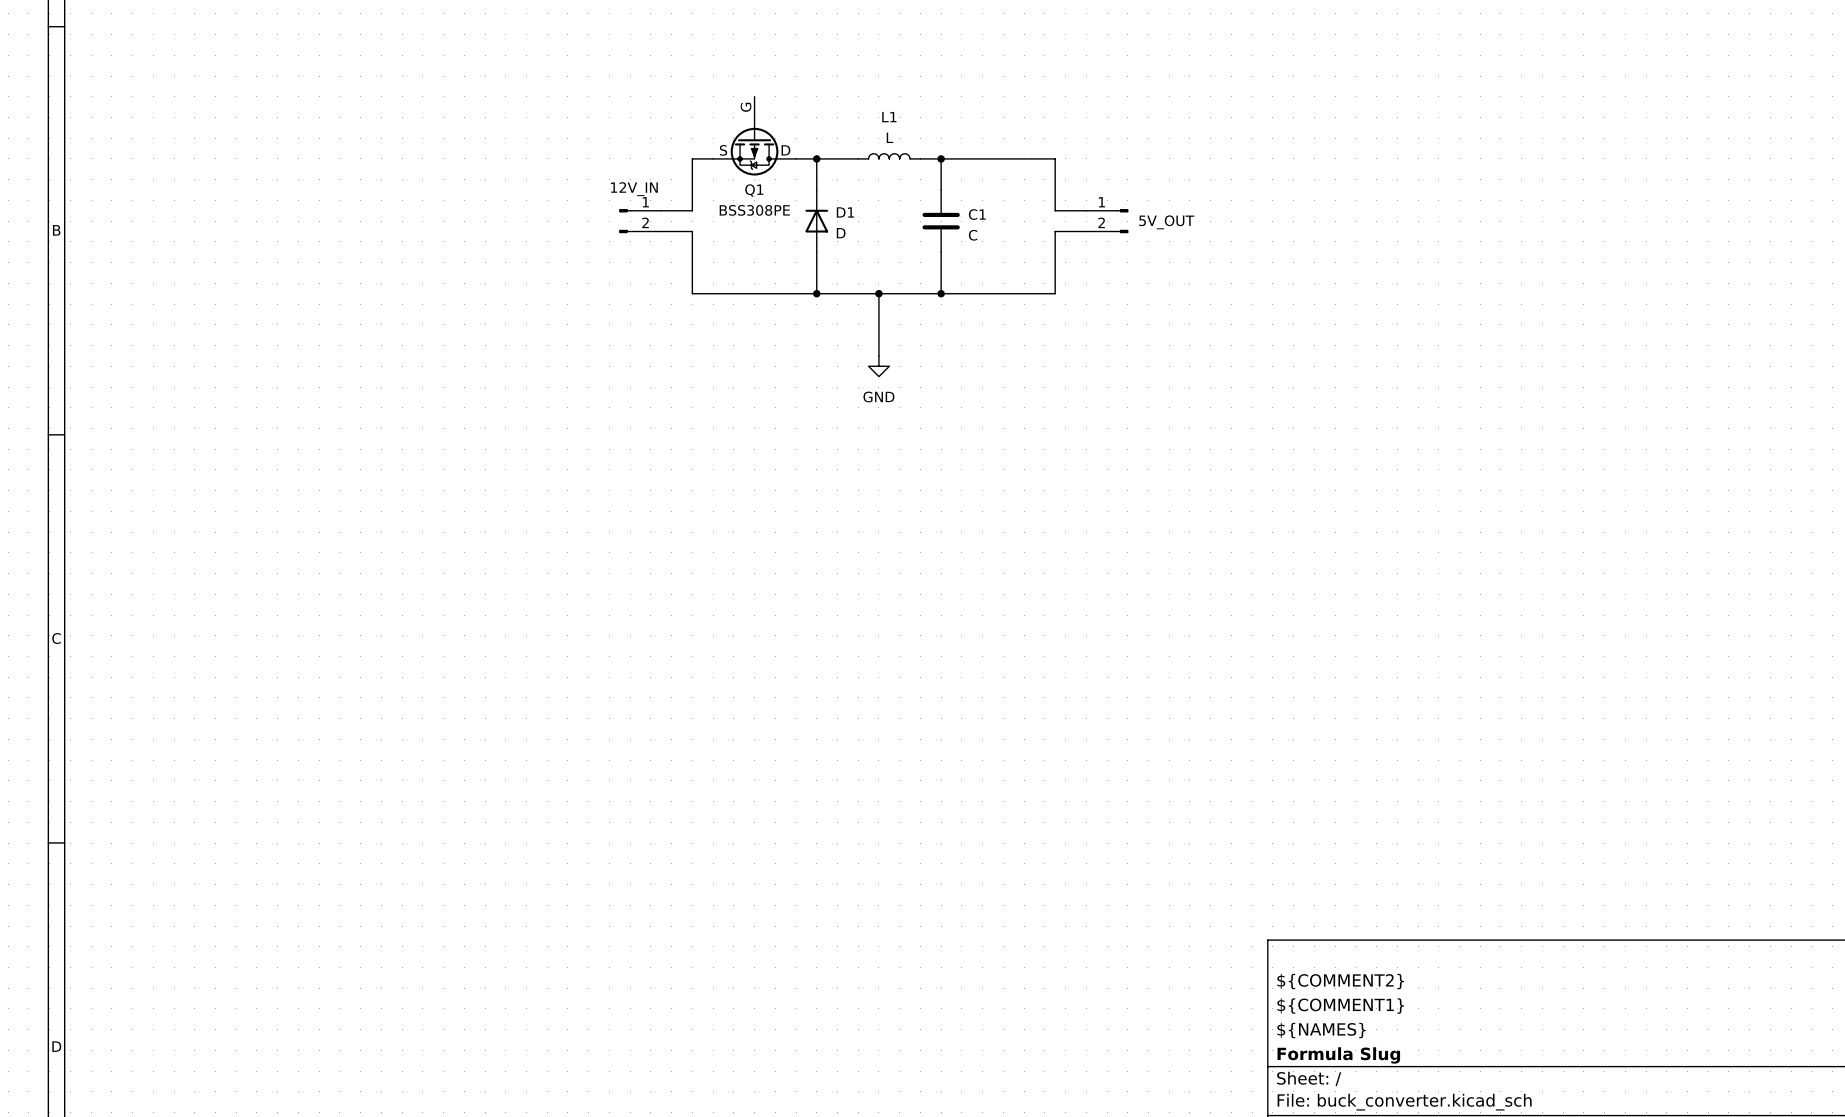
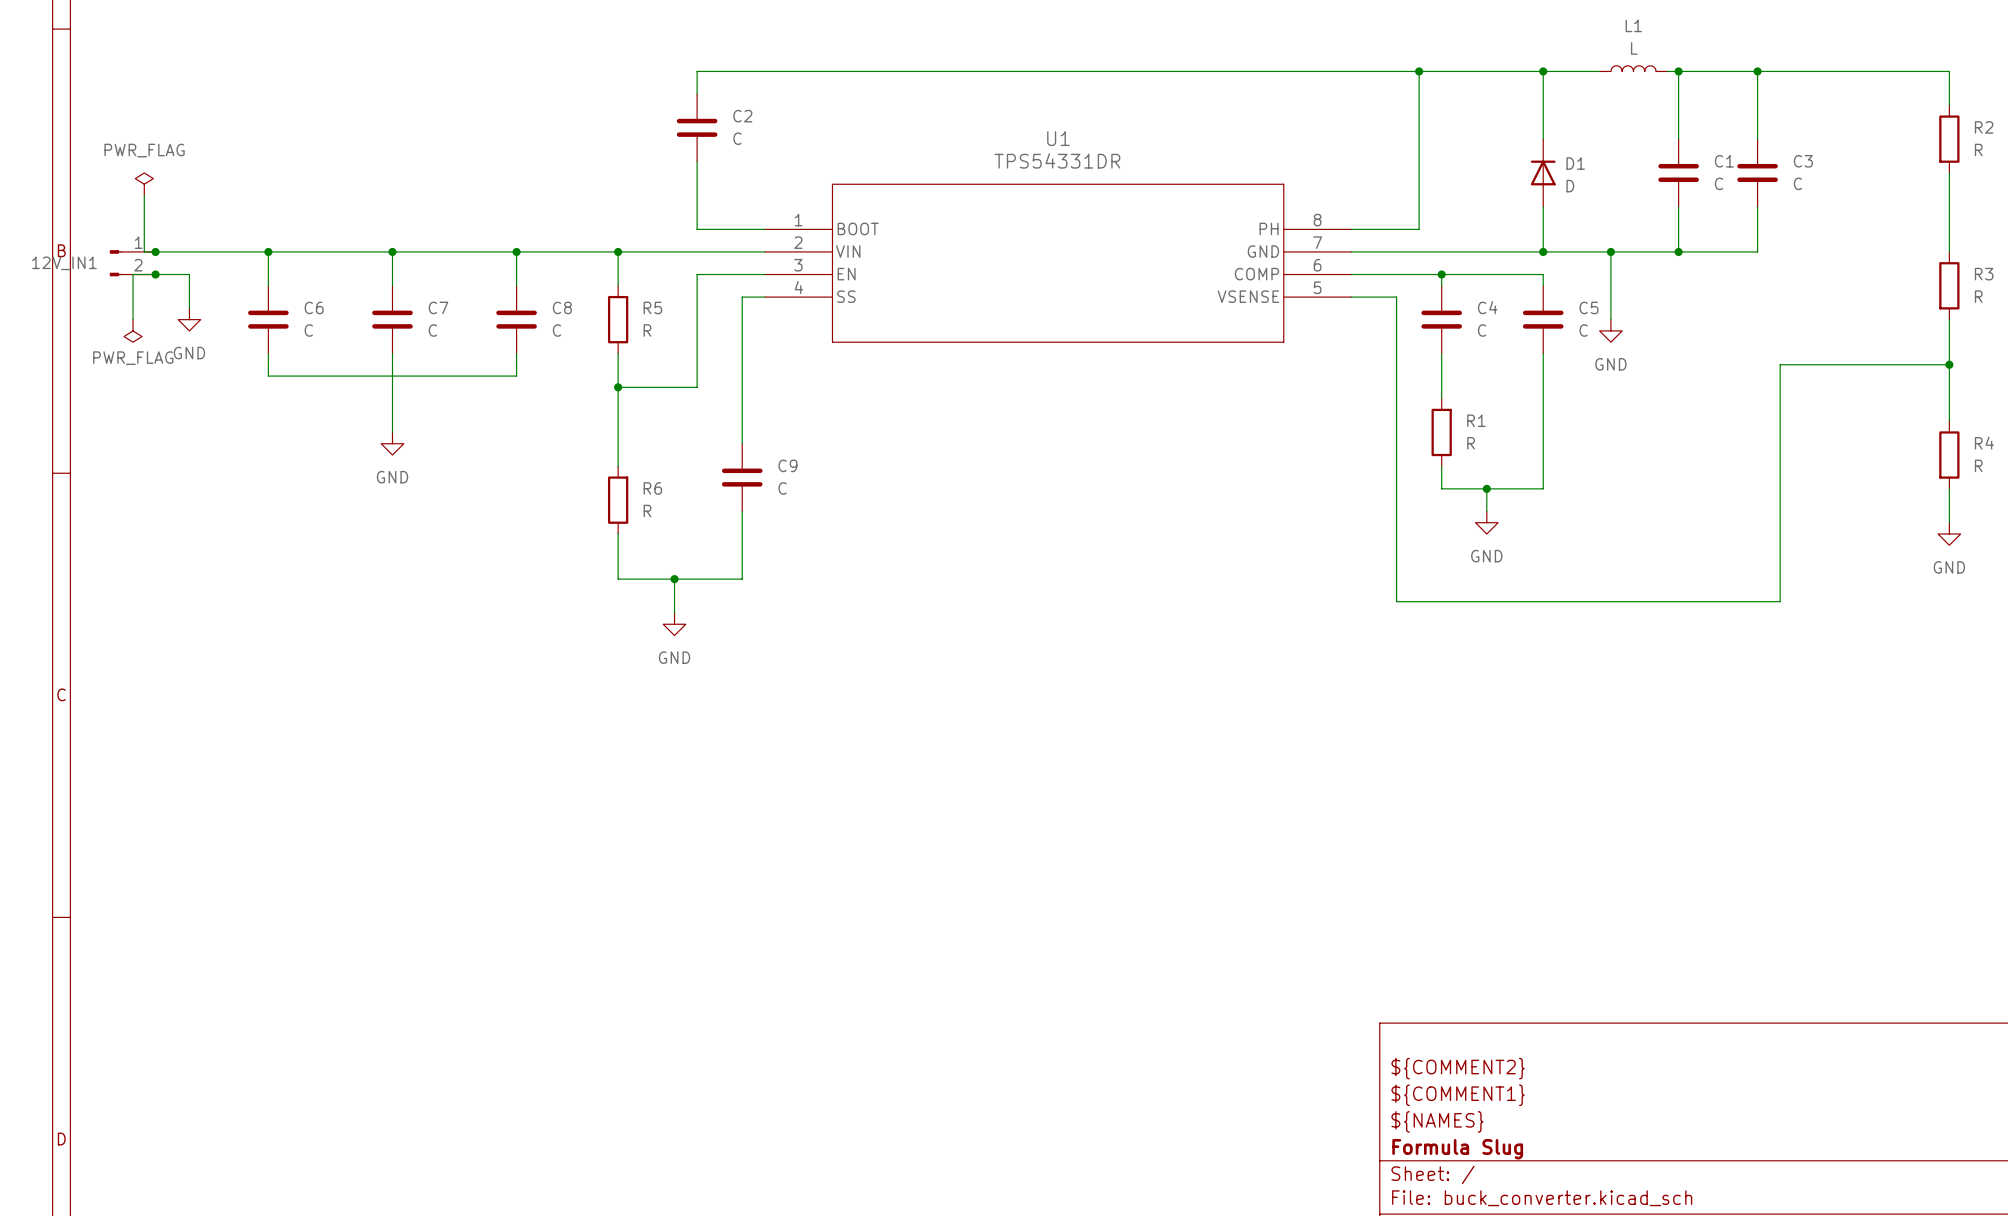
wire: none -> (1419, 71) (1419, 229) (1351, 229)
junction: none -> (1419, 71)
wire: none -> (1543, 71) (1543, 139)
junction: none -> (1543, 71)
wire: none -> (1599, 71) (697, 71) (697, 94)
wire: none -> (1667, 71) (1949, 71) (1949, 105)
wire: none -> (1678, 71) (1678, 139)
junction: none -> (1678, 71)
wire: none -> (1757, 71) (1757, 139)
junction: none -> (1757, 71)
C2: none -> C (697, 127)
R2: none -> R (1949, 139)
Q1: BSS308PE (754, 136) -> none
wire: none -> (697, 161) (697, 229) (719, 229)
L1 position: (889, 156) -> (1633, 68)
wire: (713, 158) (692, 158) (692, 210) -> (764, 229) (753, 229)
wire: (796, 158) (858, 158) -> none
wire: (816, 158) (816, 190) -> none
junction: (816, 158) -> none
wire: (920, 158) (1055, 158) (1055, 210) (1086, 210) -> none
wire: (941, 158) (941, 190) -> none
junction: (941, 158) -> none
C3: none -> C (1757, 172)
wire: none -> (1949, 172) (1949, 251)
power symbol: none -> PWR_FLAG (144, 184)
wire: none -> (144, 195) (144, 251) (719, 251)
wire: none -> (1543, 206) (1543, 251)
wire: none -> (1678, 206) (1678, 251)
wire: none -> (1757, 206) (1757, 251) (1351, 251)
C1 name position: C1 (977, 214) -> C1 (1724, 161)
12V_IN: (640, 221) -> none
D1 position: (816, 221) -> (1543, 172)
C1 position: (941, 221) -> (1678, 172)
5V_OUT: (1107, 221) -> none
junction: none -> (155, 251)
wire: none -> (268, 251) (268, 285)
junction: none -> (268, 251)
wire: none -> (392, 251) (392, 285)
junction: none -> (392, 251)
wire: none -> (516, 251) (516, 285)
junction: none -> (516, 251)
wire: none -> (618, 251) (618, 285)
junction: none -> (618, 251)
wire: (692, 231) (692, 293) (1055, 293) (1055, 231) (1086, 231) -> (753, 251) (764, 251)
junction: none -> (1543, 251)
wire: none -> (1610, 251) (1610, 319)
junction: none -> (1610, 251)
junction: none -> (1678, 251)
C1 value position: C (973, 235) -> C (1718, 183)
12V_IN1: none -> (132, 263)
U1: none -> TPS54331DR (1058, 263)
junction: none -> (155, 274)
wire: none -> (764, 274) (697, 274) (697, 387) (618, 387)
wire: (816, 252) (816, 293) -> none
wire: (941, 252) (941, 293) -> none
wire: none -> (1351, 274) (1543, 274) (1543, 285)
wire: none -> (1441, 274) (1441, 285)
junction: none -> (1441, 274)
R3: none -> R (1949, 285)
wire: none -> (764, 297) (742, 297) (742, 443)
wire: none -> (1351, 297) (1396, 297) (1396, 601) (1780, 601) (1780, 364) (1949, 364)
wire: none -> (189, 308) (189, 274) (133, 274) (133, 319)
power symbol: none -> GND (189, 319)
C6: none -> C (268, 319)
C7: none -> C (392, 319)
C8: none -> C (516, 319)
R5: none -> R (618, 319)
junction: (816, 293) -> none
wire: (878, 293) (878, 355) -> none
junction: (878, 293) -> none
junction: (941, 293) -> none
C4: none -> C (1441, 319)
C5: none -> C (1543, 319)
wire: none -> (1949, 319) (1949, 421)
power symbol: none -> PWR_FLAG (133, 330)
power symbol: none -> GND (1610, 330)
wire: none -> (268, 353) (268, 376) (516, 376) (516, 353)
wire: none -> (392, 353) (392, 432)
wire: none -> (618, 353) (618, 466)
wire: none -> (1441, 353) (1441, 398)
wire: none -> (1543, 353) (1543, 488) (1441, 488) (1441, 466)
junction: none -> (1949, 364)
junction: none -> (618, 387)
power symbol: GND (878, 366) -> none
R1: none -> R (1441, 432)
power symbol: none -> GND (392, 443)
R4: none -> R (1949, 455)
C9: none -> C (742, 477)
wire: none -> (1486, 488) (1486, 511)
junction: none -> (1486, 488)
wire: none -> (1949, 488) (1949, 522)
R6: none -> R (618, 500)
wire: none -> (742, 511) (742, 579) (618, 579) (618, 534)
power symbol: none -> GND (1486, 522)
power symbol: none -> GND (1949, 534)
wire: none -> (674, 579) (674, 612)
junction: none -> (674, 579)
power symbol: none -> GND (674, 624)

